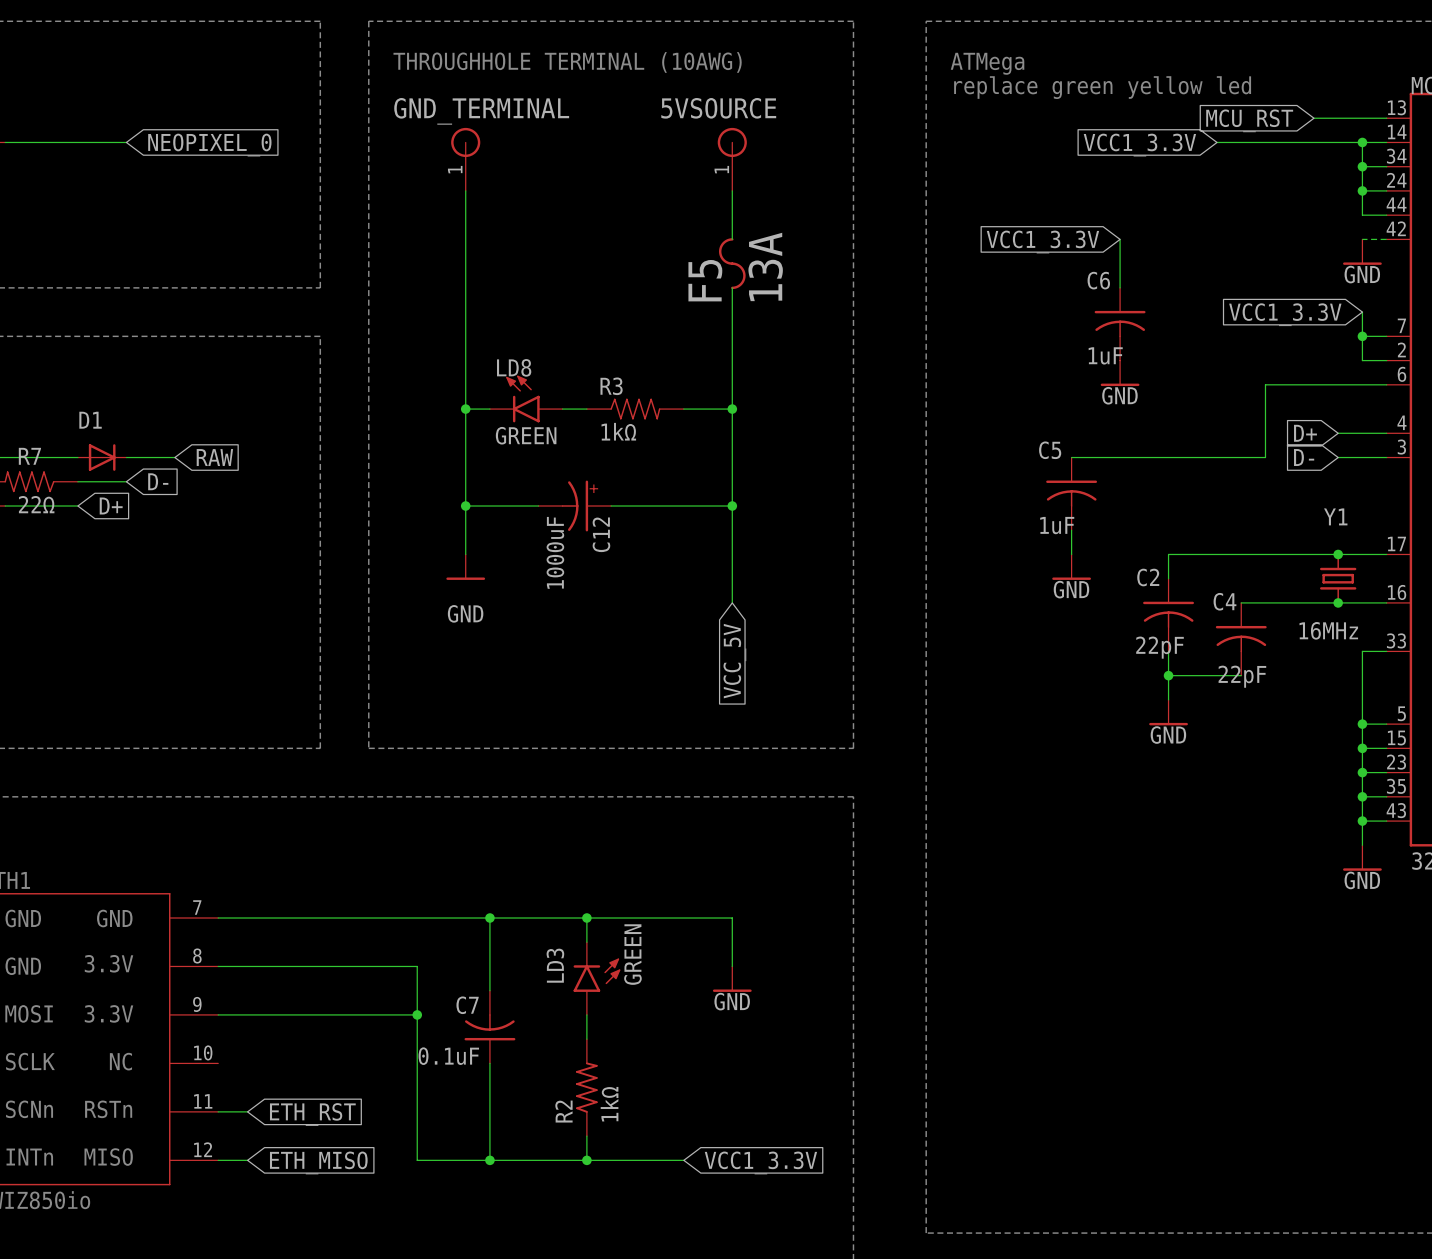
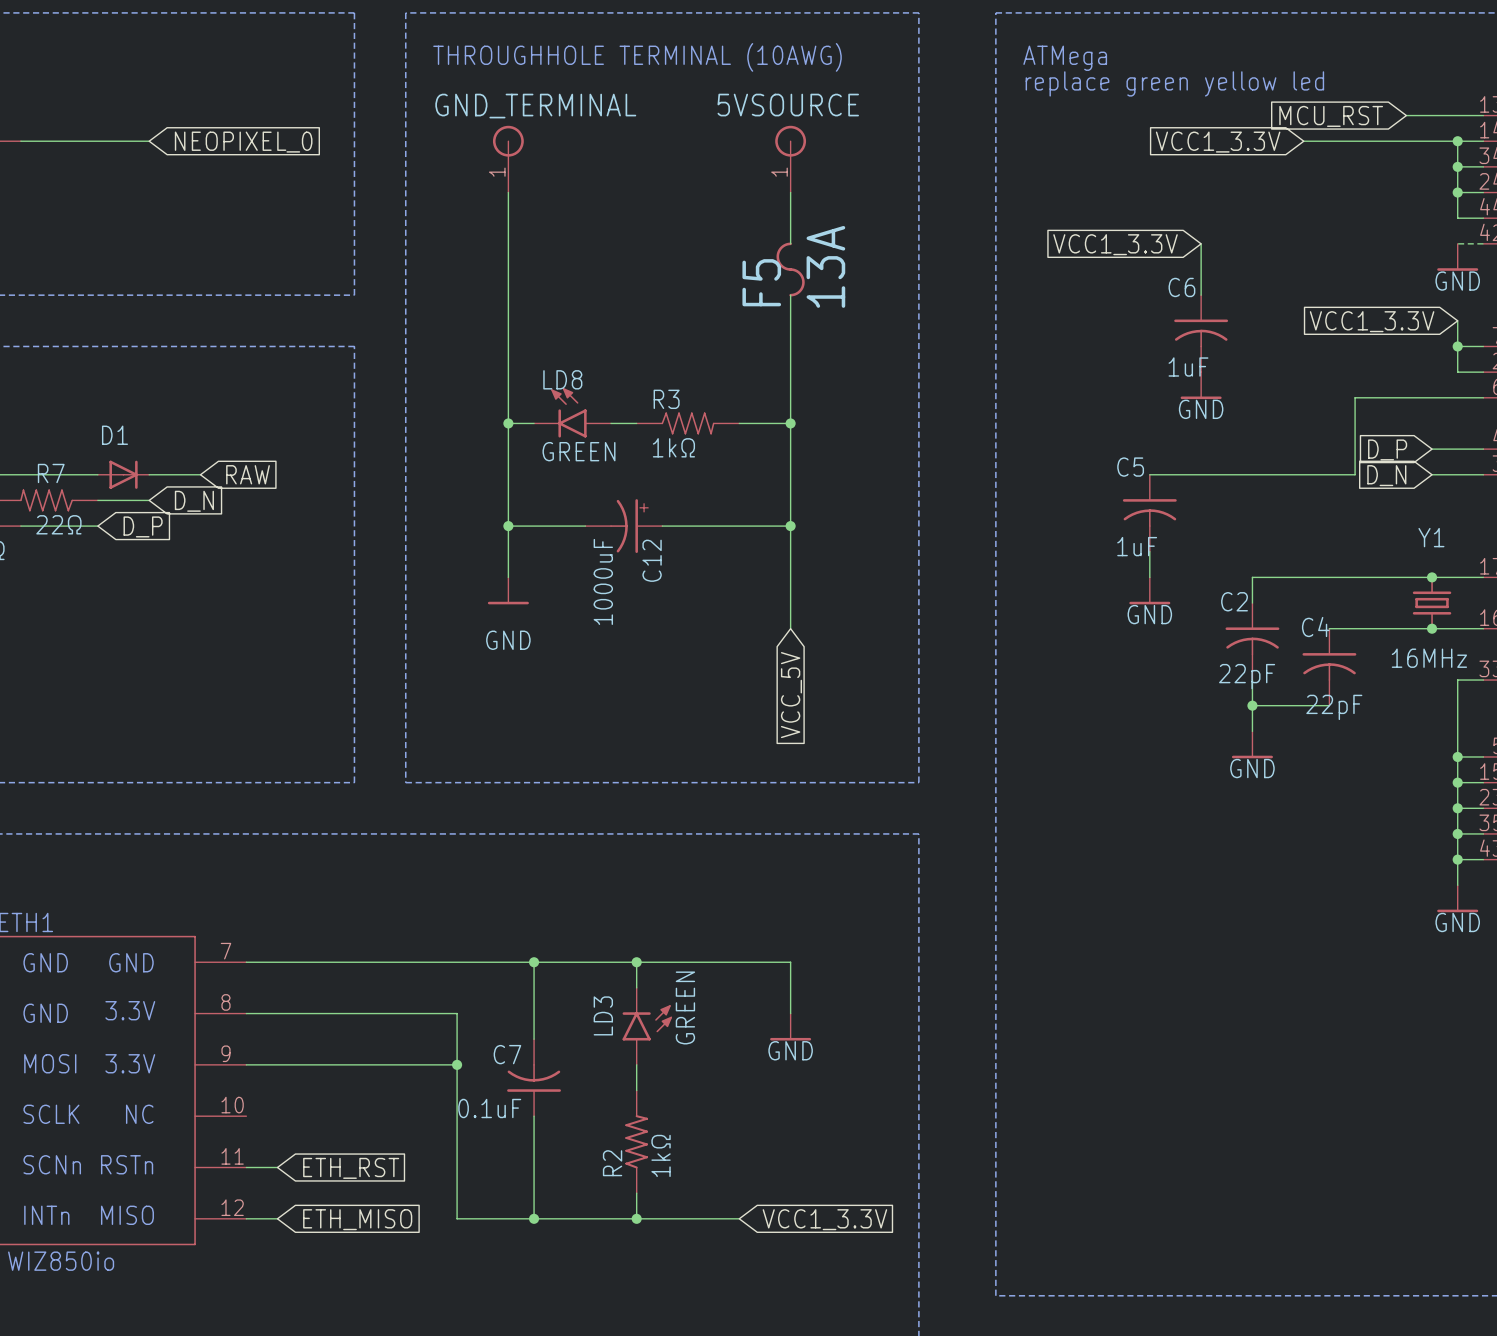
global label: D+ (1305, 433) -> D_P (1387, 449)
global label: D- (1304, 457) -> D_N (1386, 475)
global label: D- (158, 481) -> D_N (194, 501)
global label: D+ (111, 506) -> D_P (143, 526)

